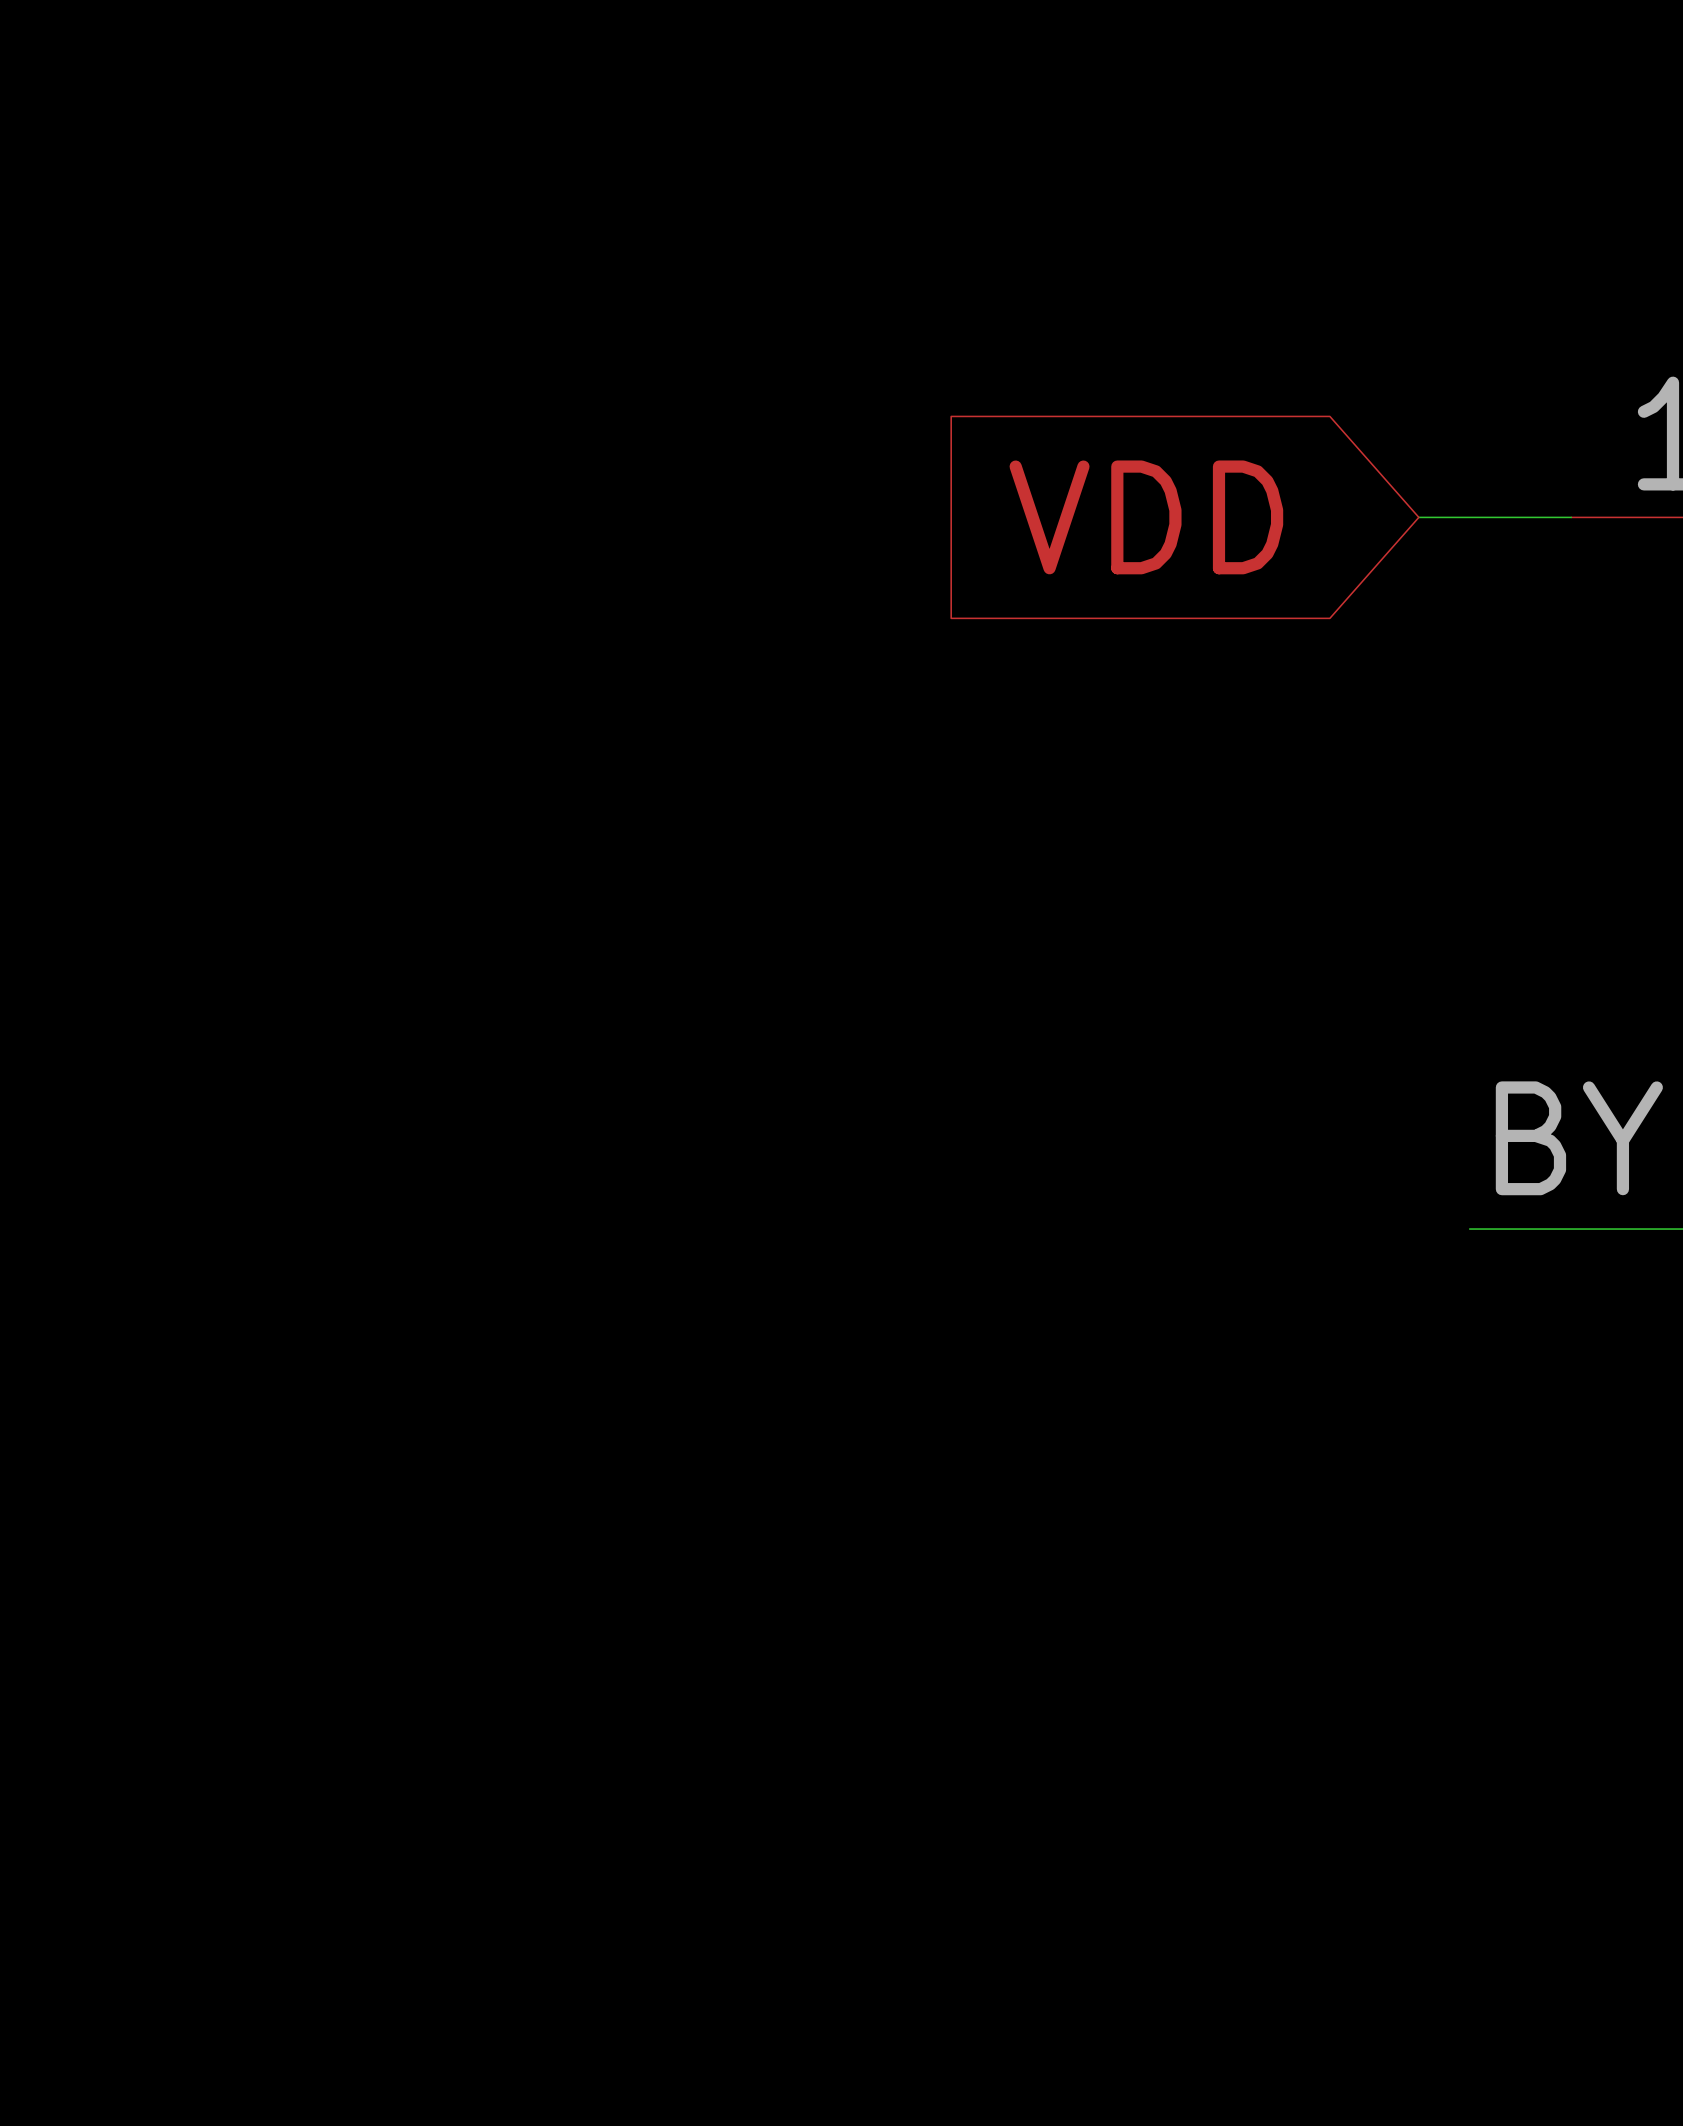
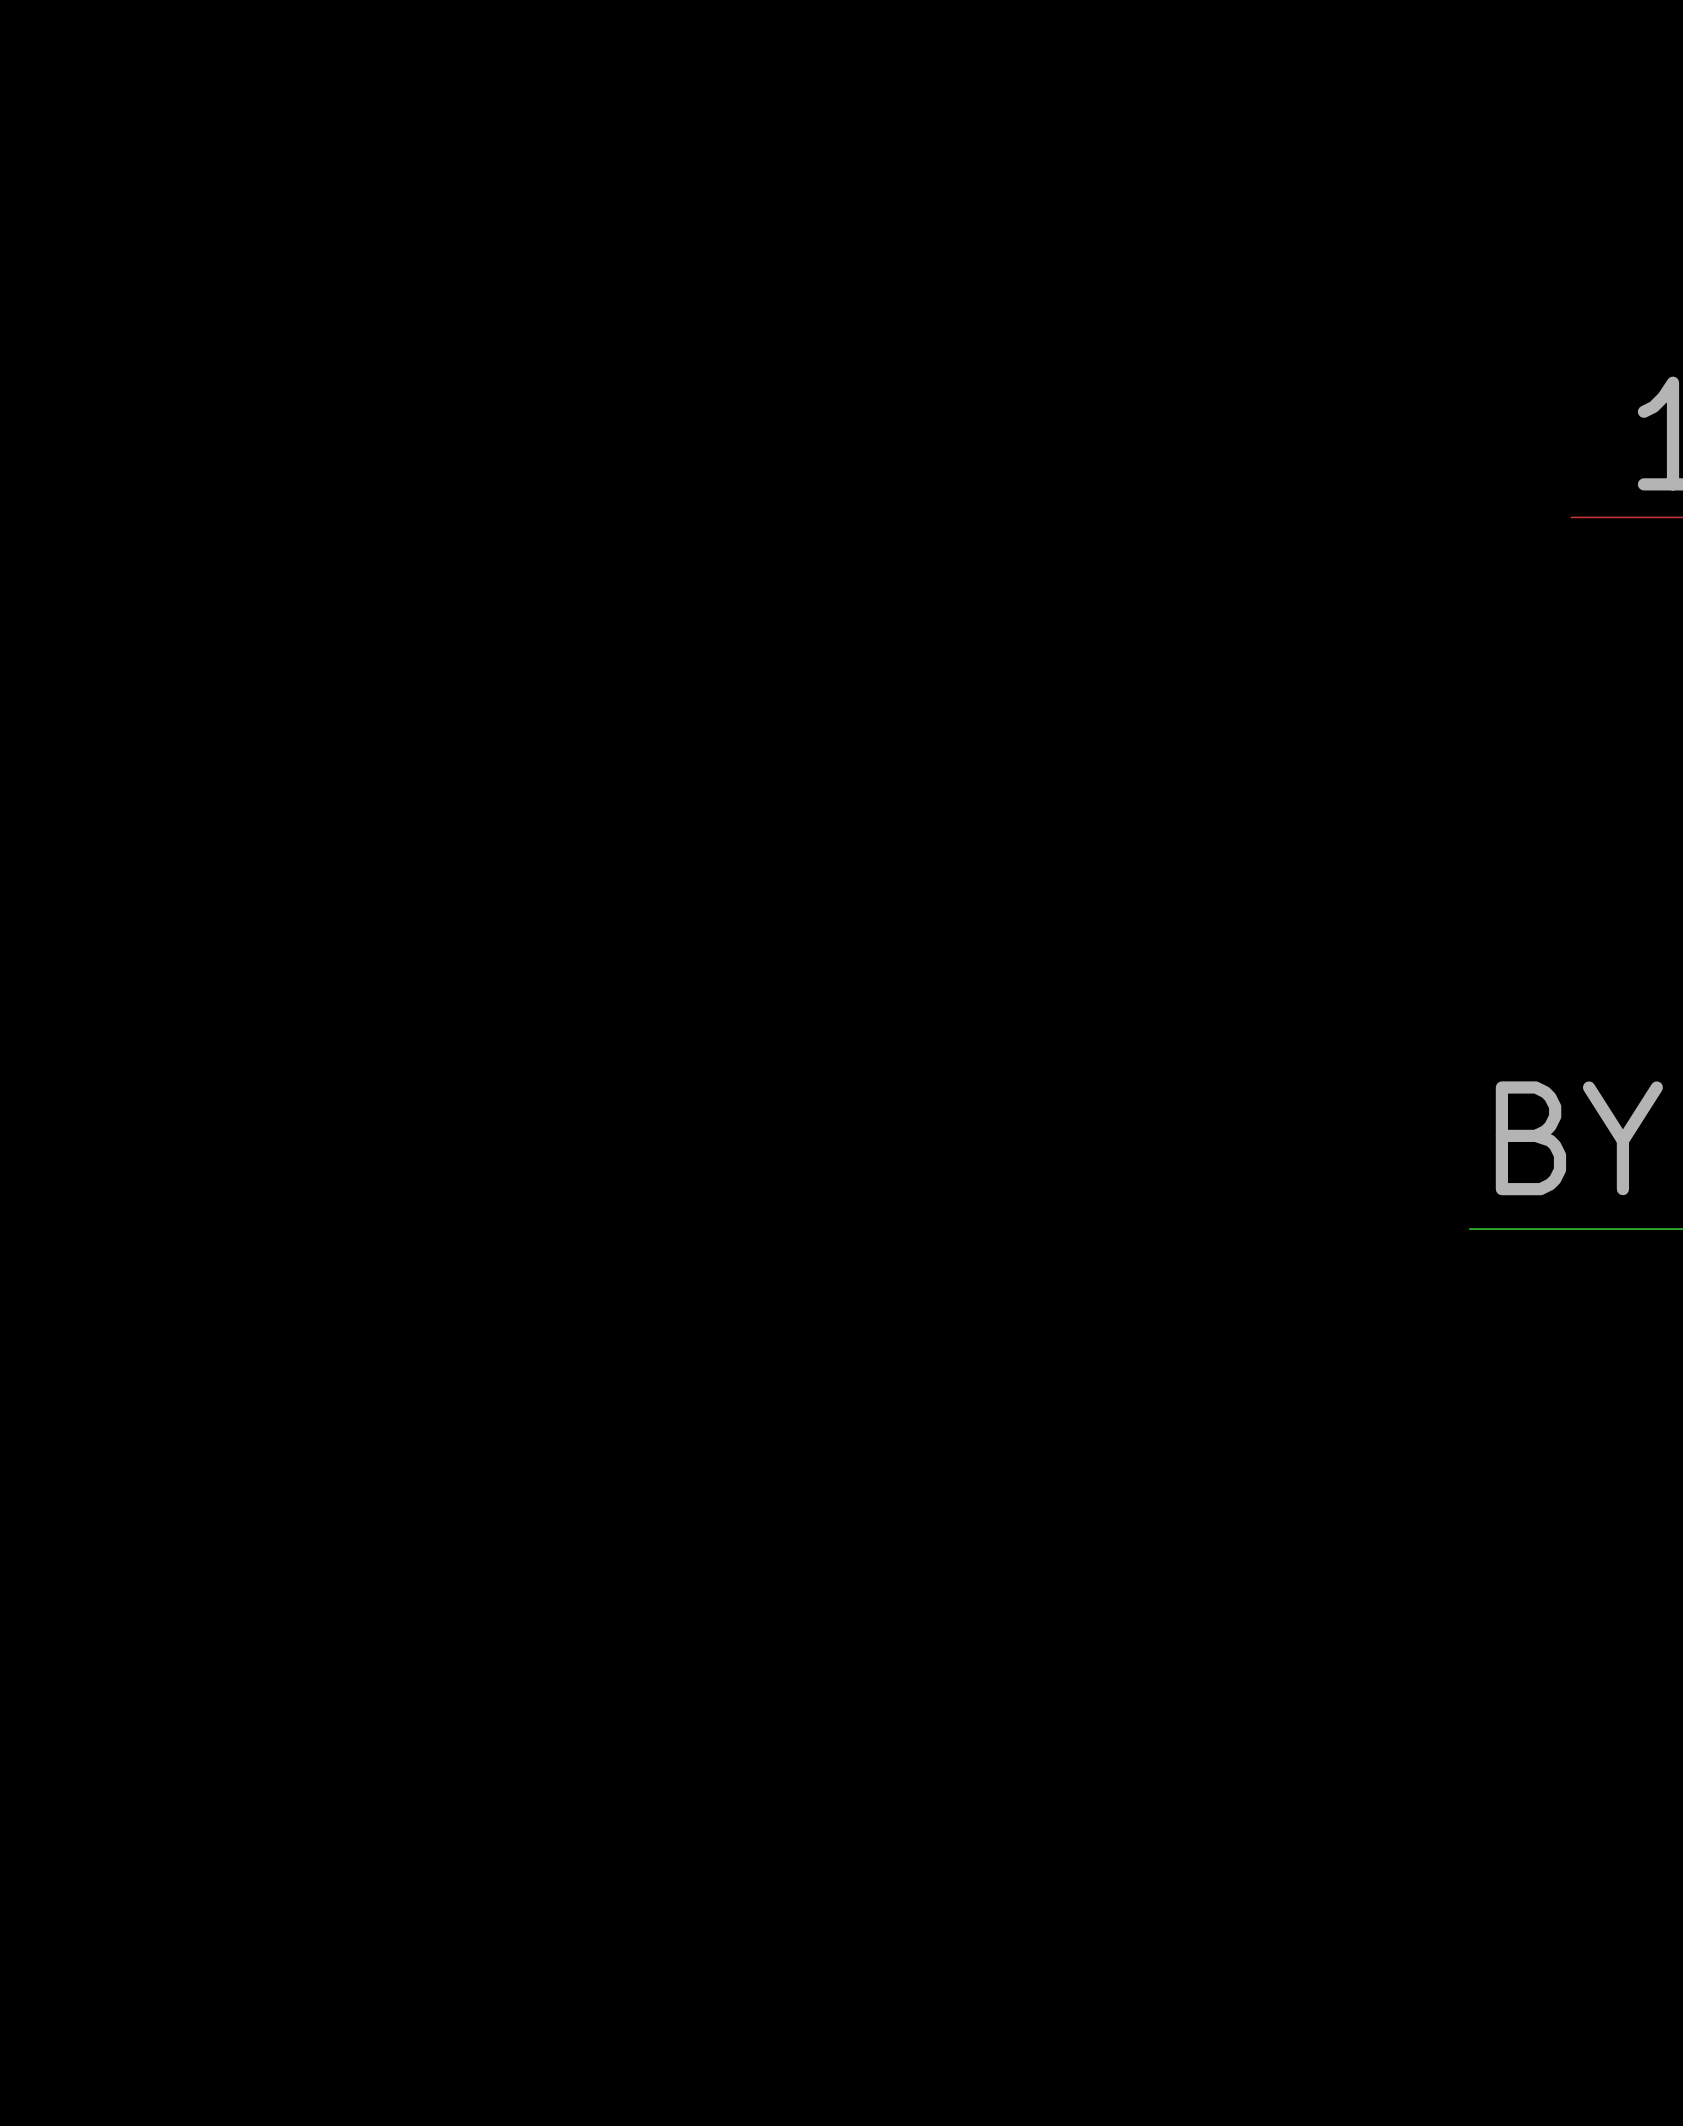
global label: VDD (1146, 517) -> none
wire: (1418, 517) (1571, 517) -> none

